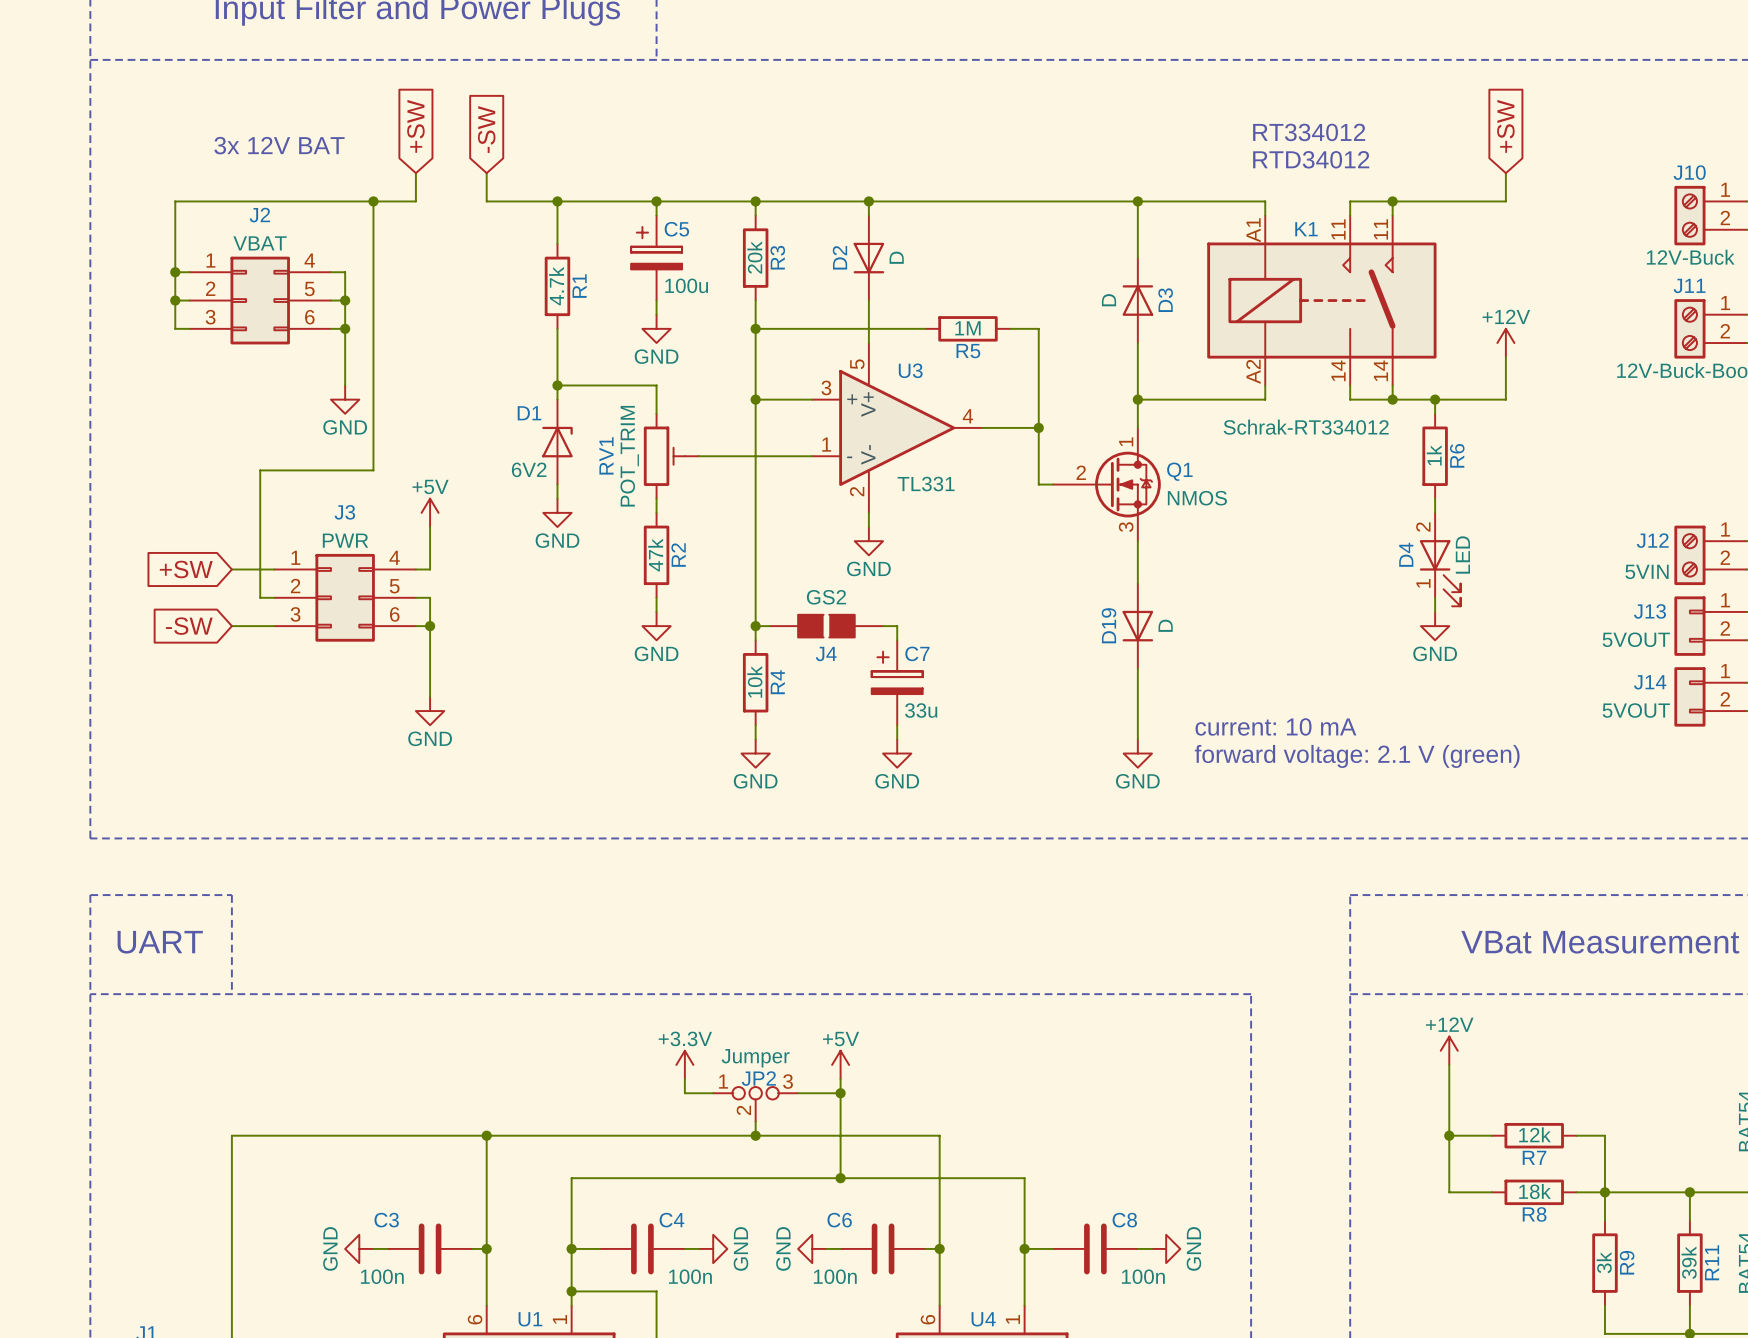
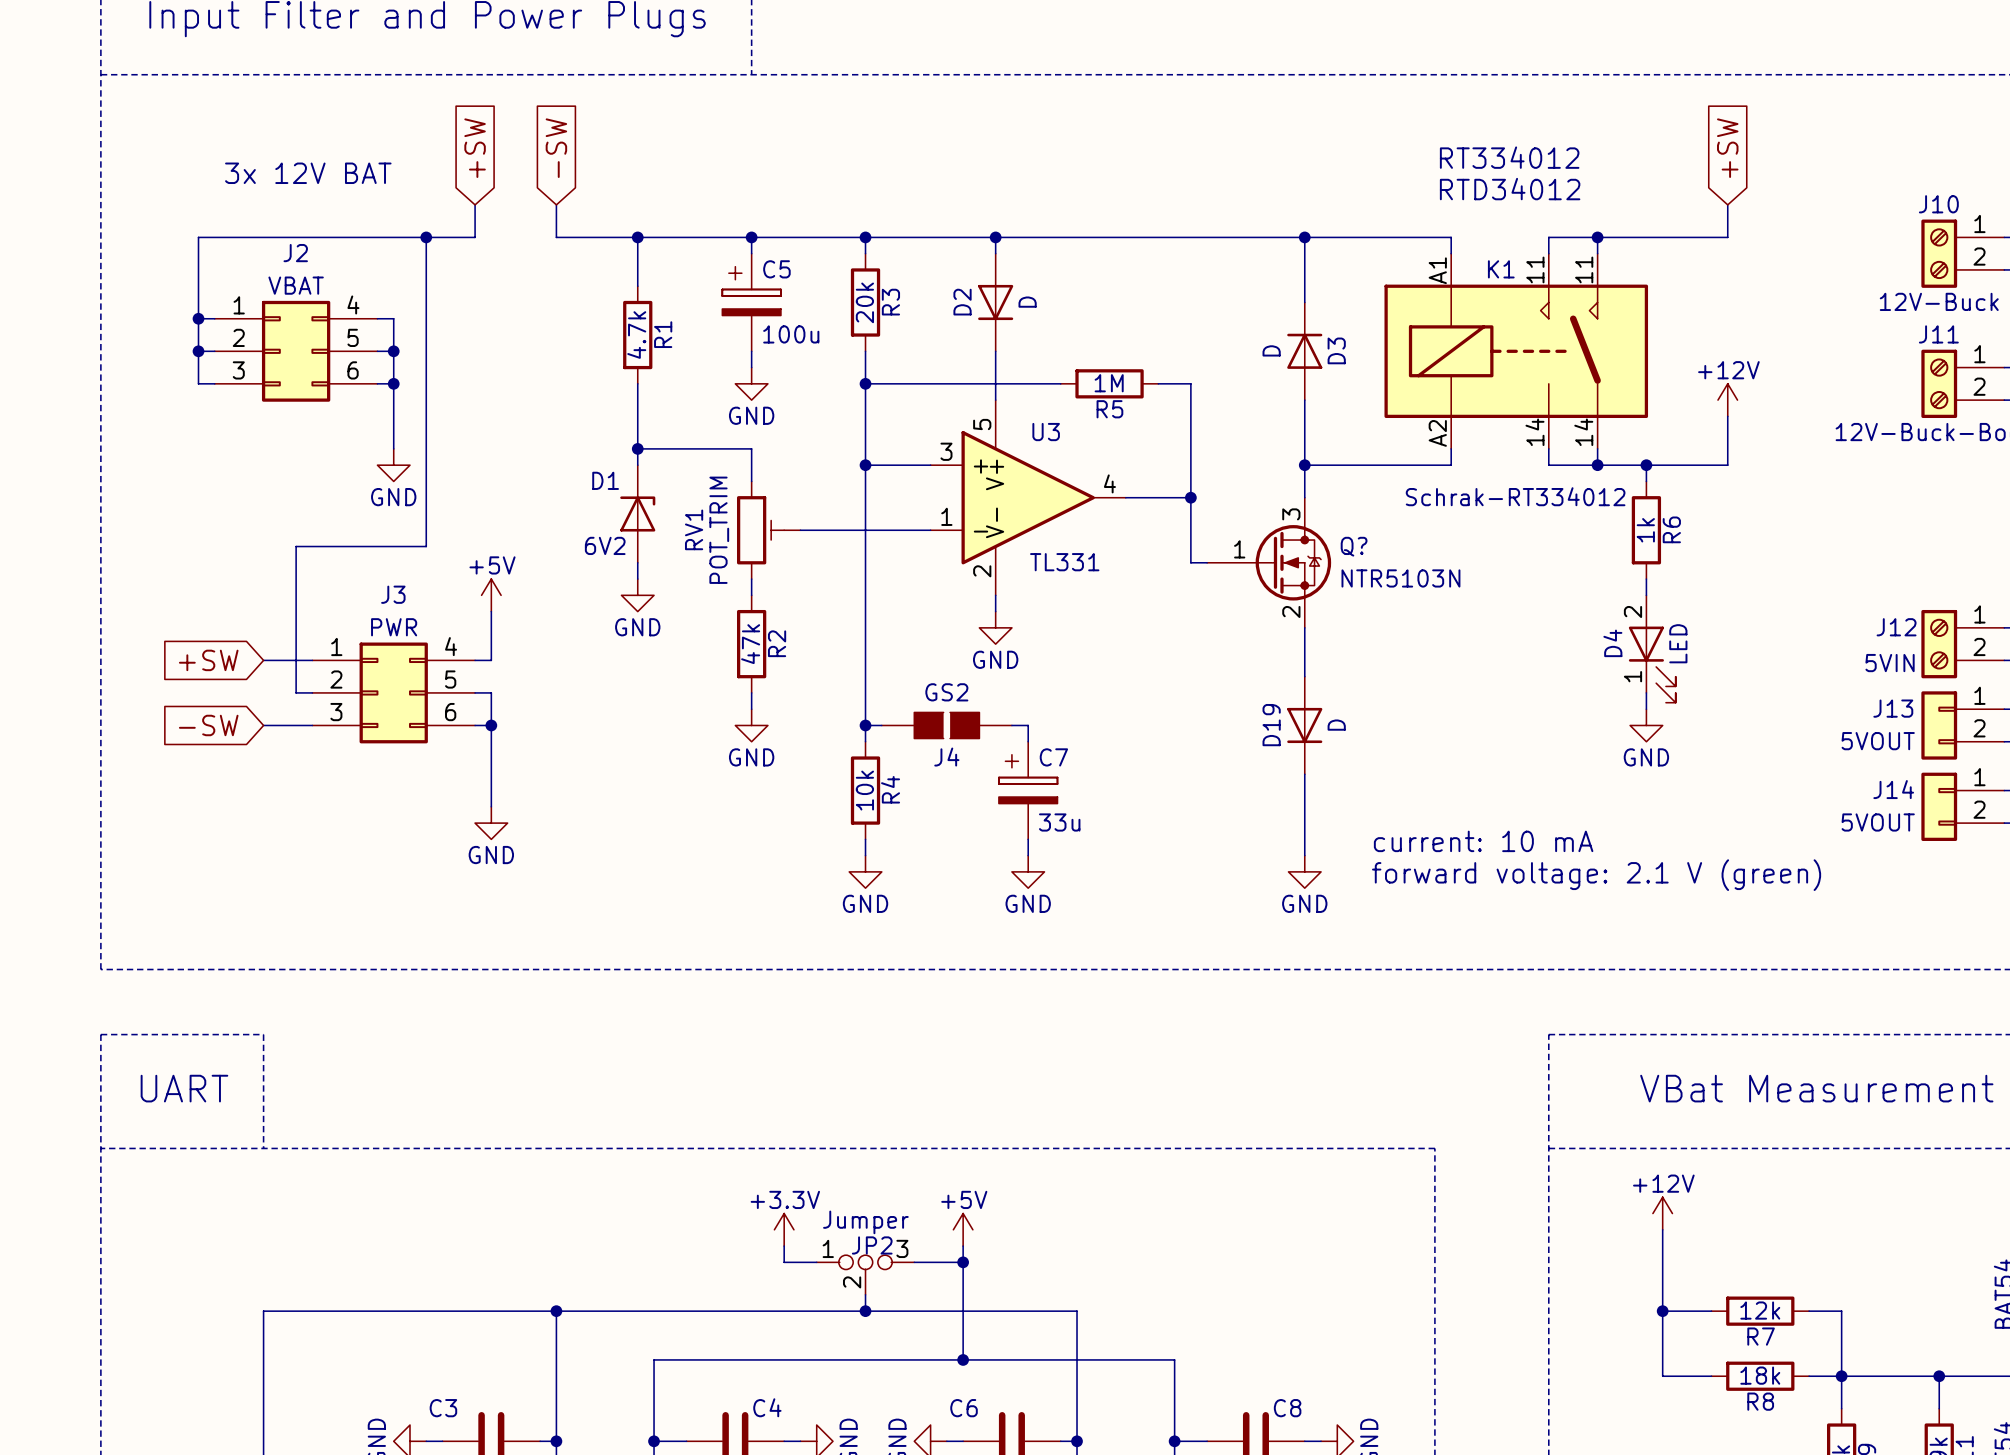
Q1 pin number: 1 (1126, 441) -> 3 (1291, 514)
Q1 name: Q1 (1179, 471) -> Q? (1354, 546)
Q1 pin number: 2 (1081, 472) -> 1 (1239, 549)
Q1 value: NMOS (1197, 498) -> NTR5103N (1400, 578)
Q1 pin number: 3 (1126, 527) -> 2 (1291, 611)

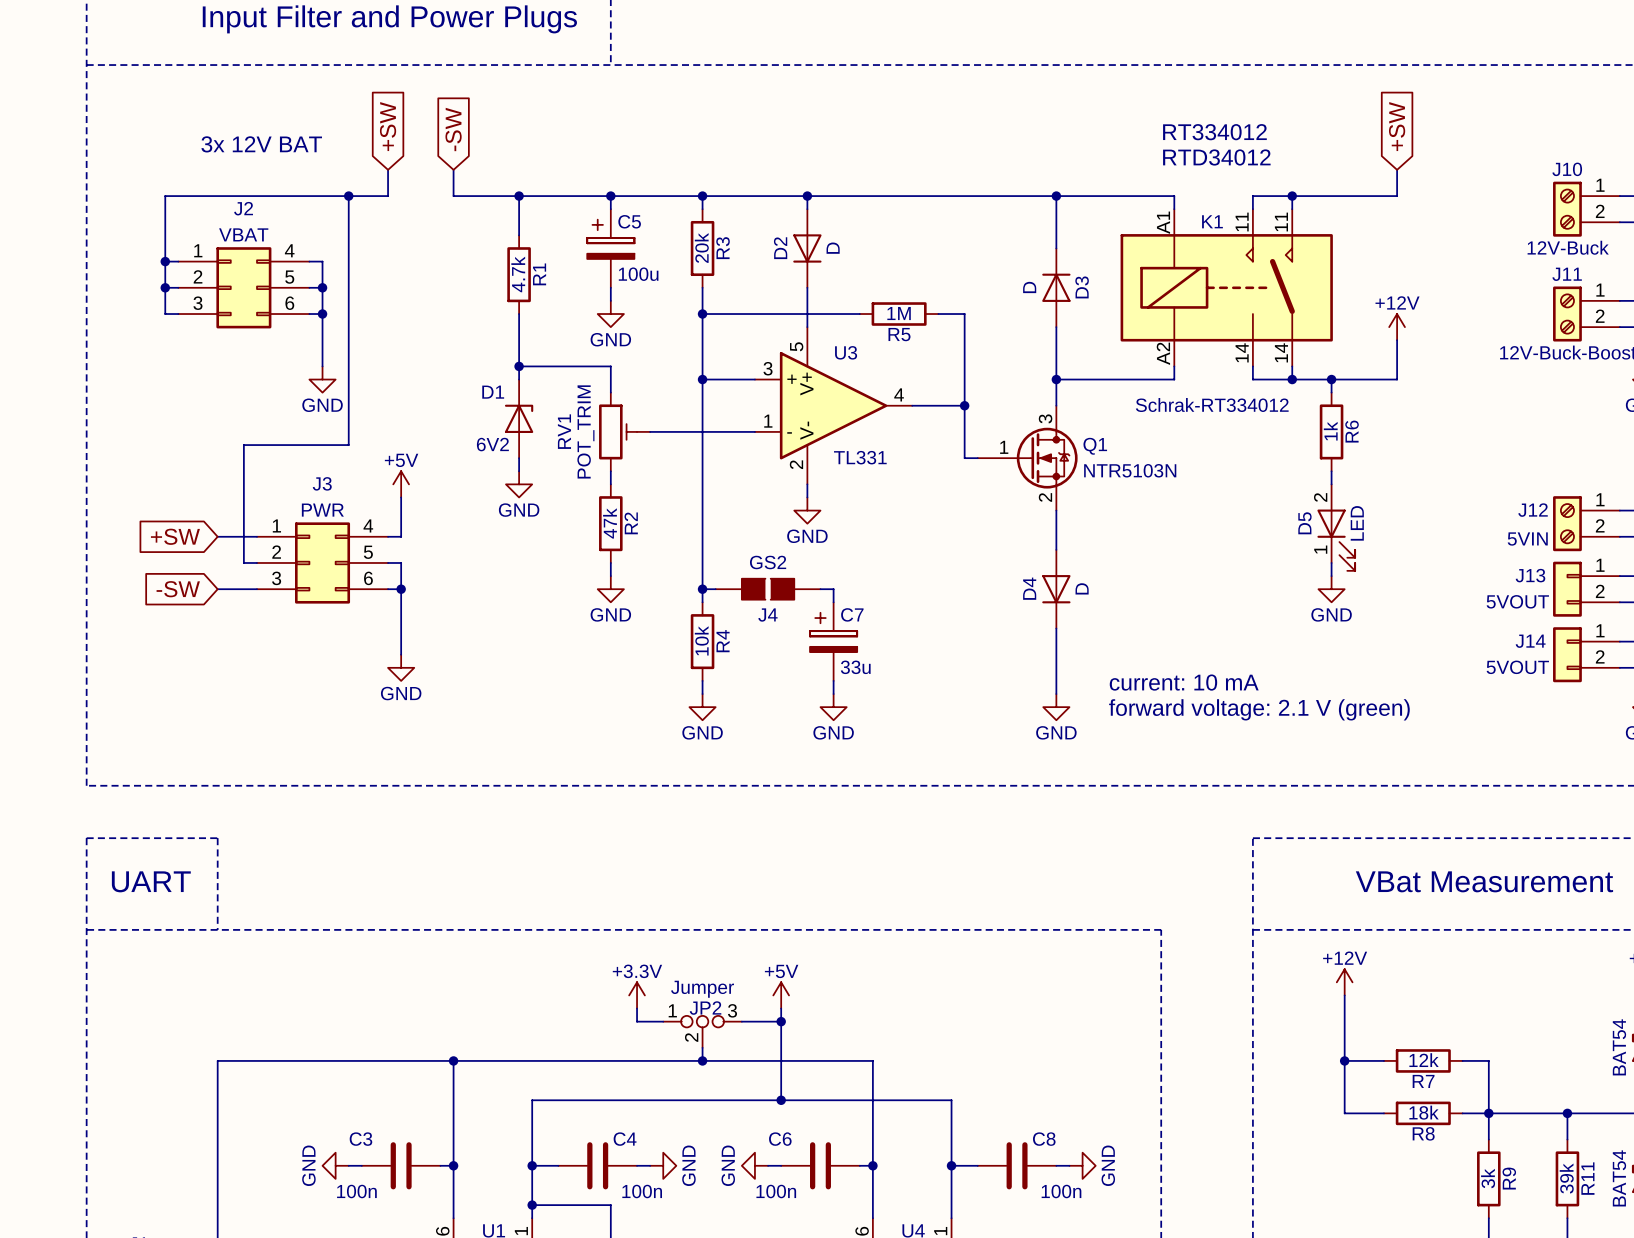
Q? name: Q? (1354, 546) -> Q1 (1095, 446)
D4 name: D4 (1612, 643) -> D5 (1304, 523)
D19 name: D19 (1271, 725) -> D4 (1029, 588)

